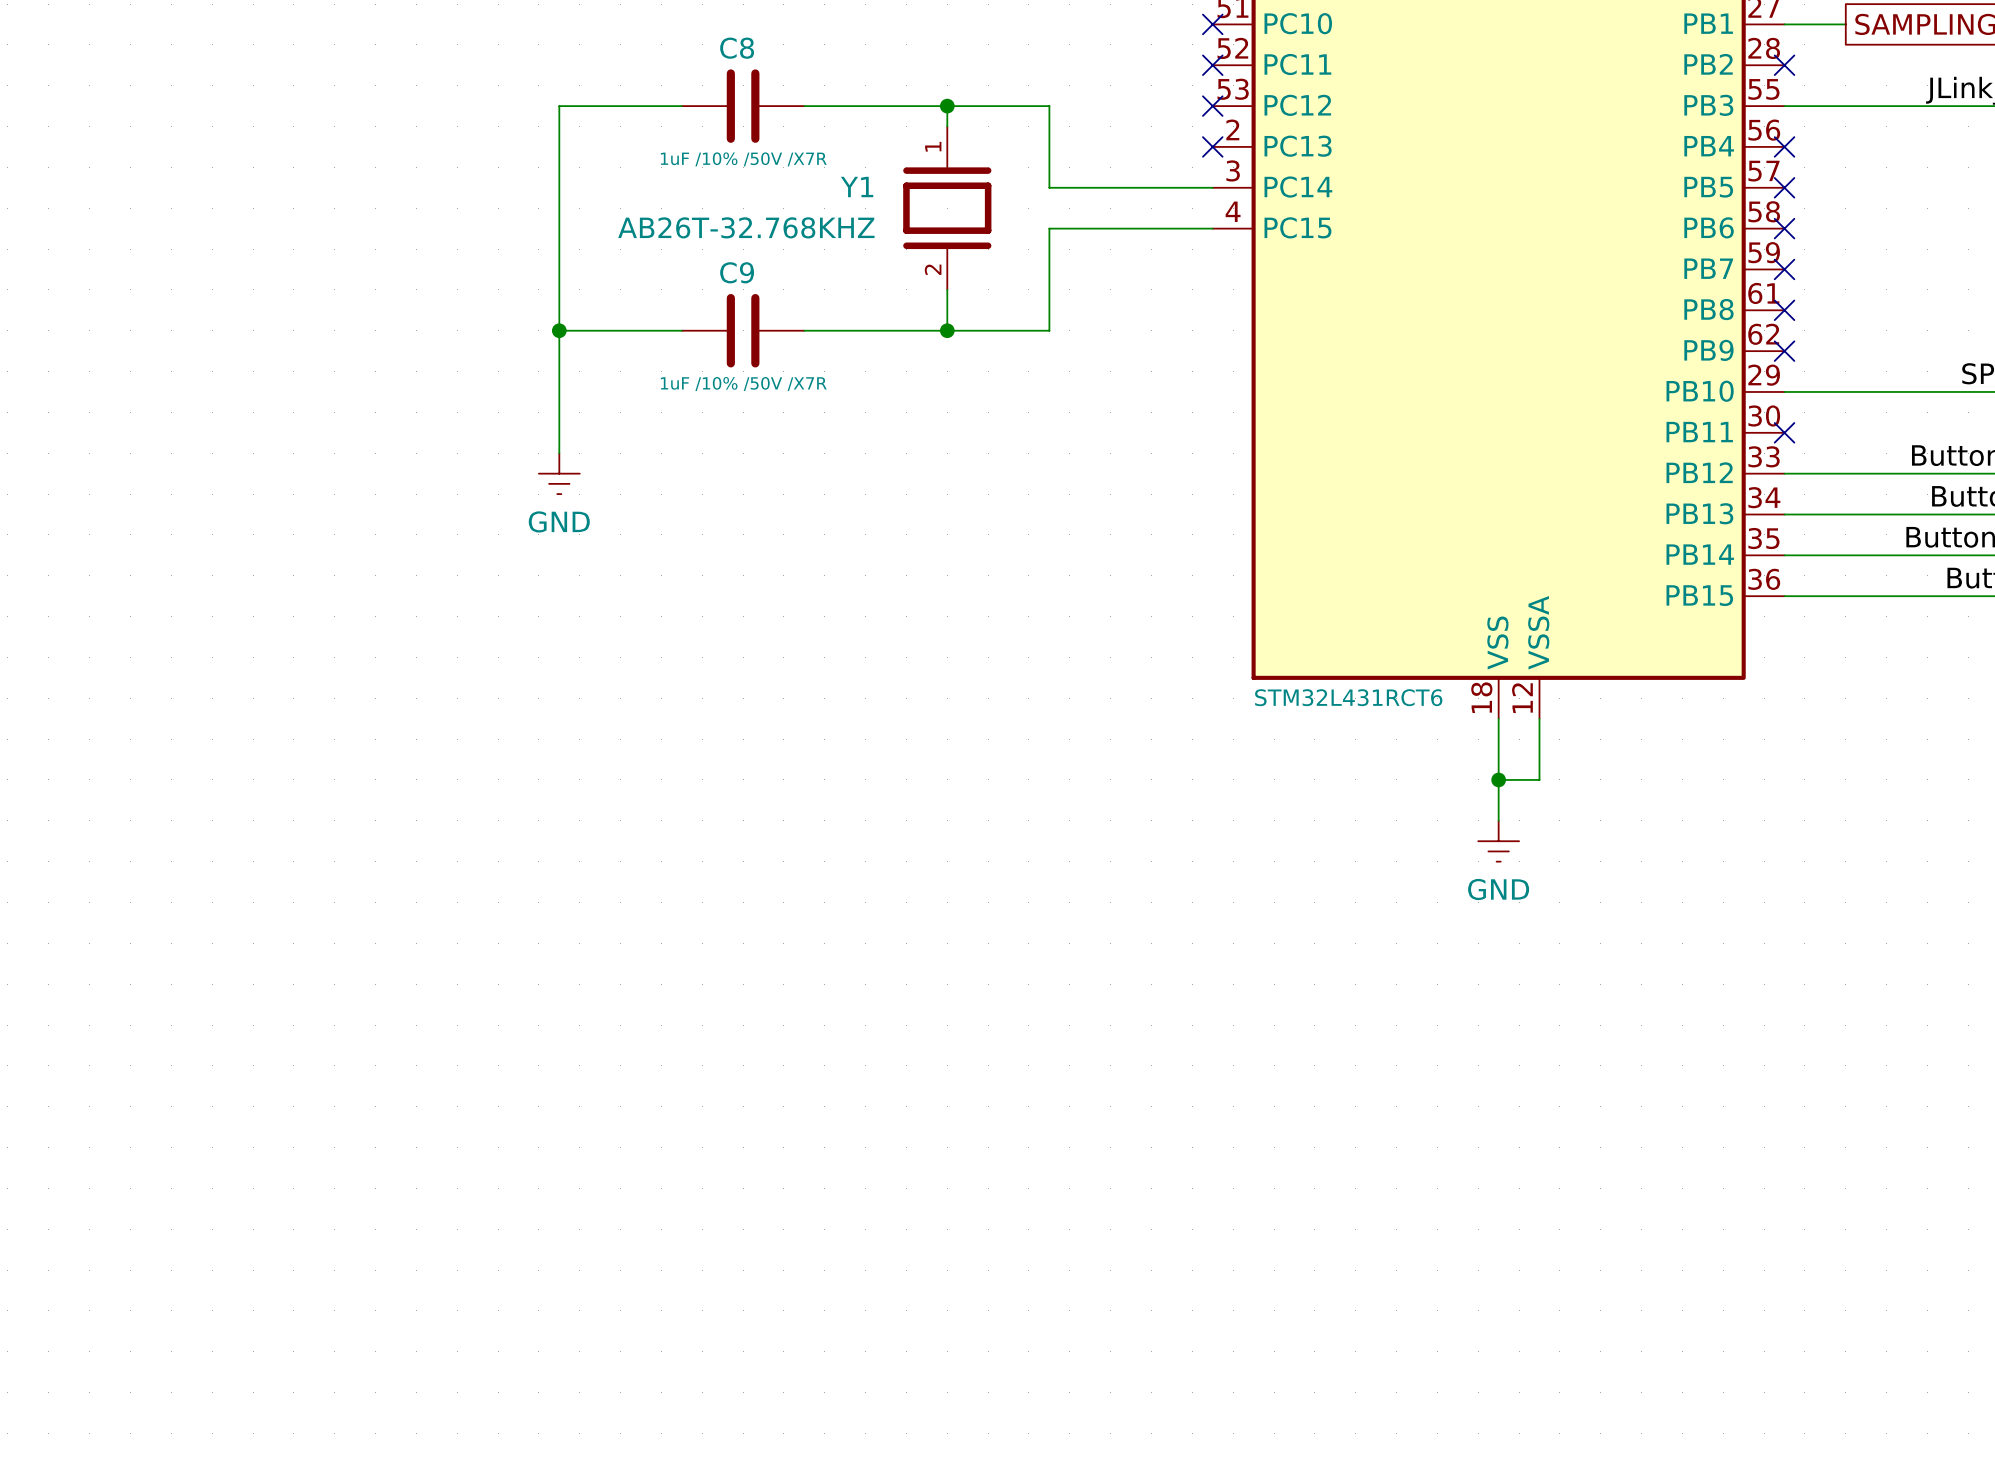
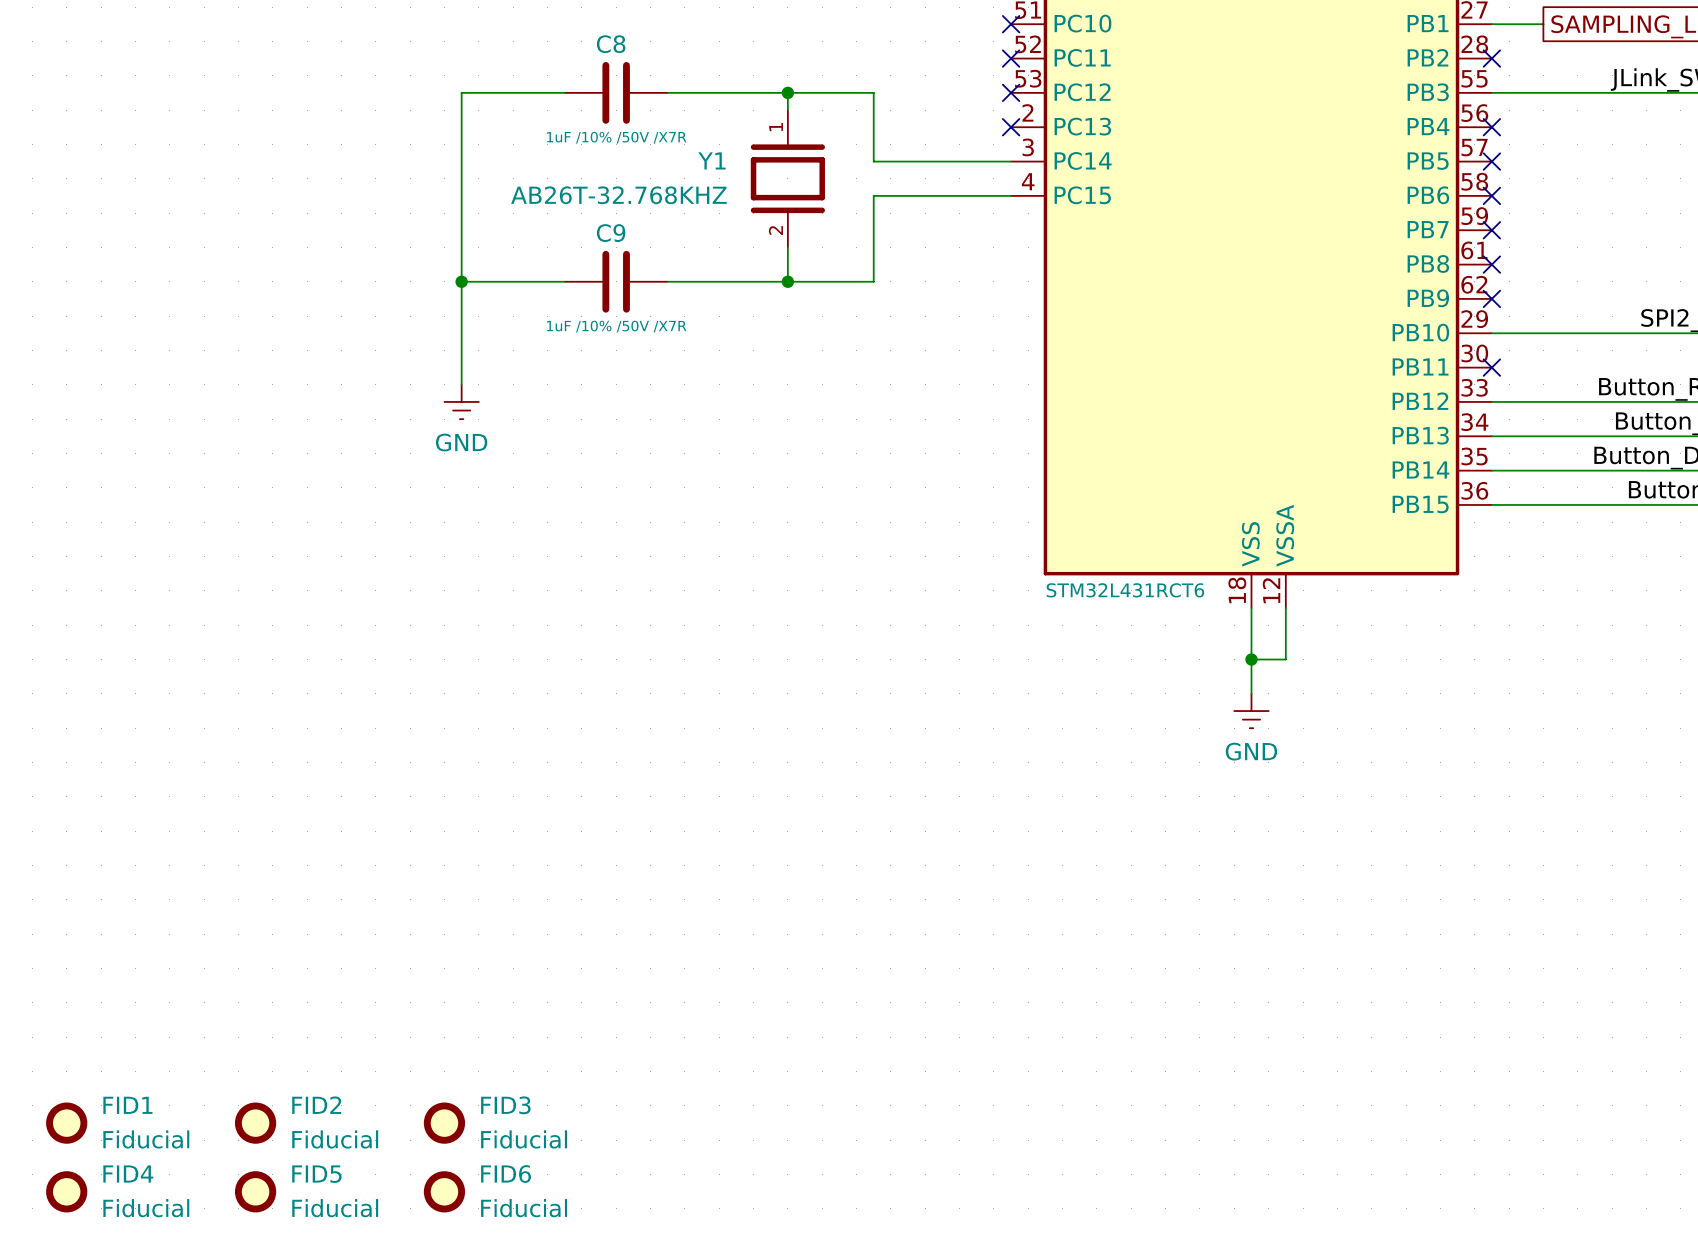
FID1: none -> Fiducial (66, 1123)
FID2: none -> Fiducial (255, 1123)
FID3: none -> Fiducial (444, 1123)
FID4: none -> Fiducial (66, 1191)
FID5: none -> Fiducial (255, 1191)
FID6: none -> Fiducial (444, 1191)

